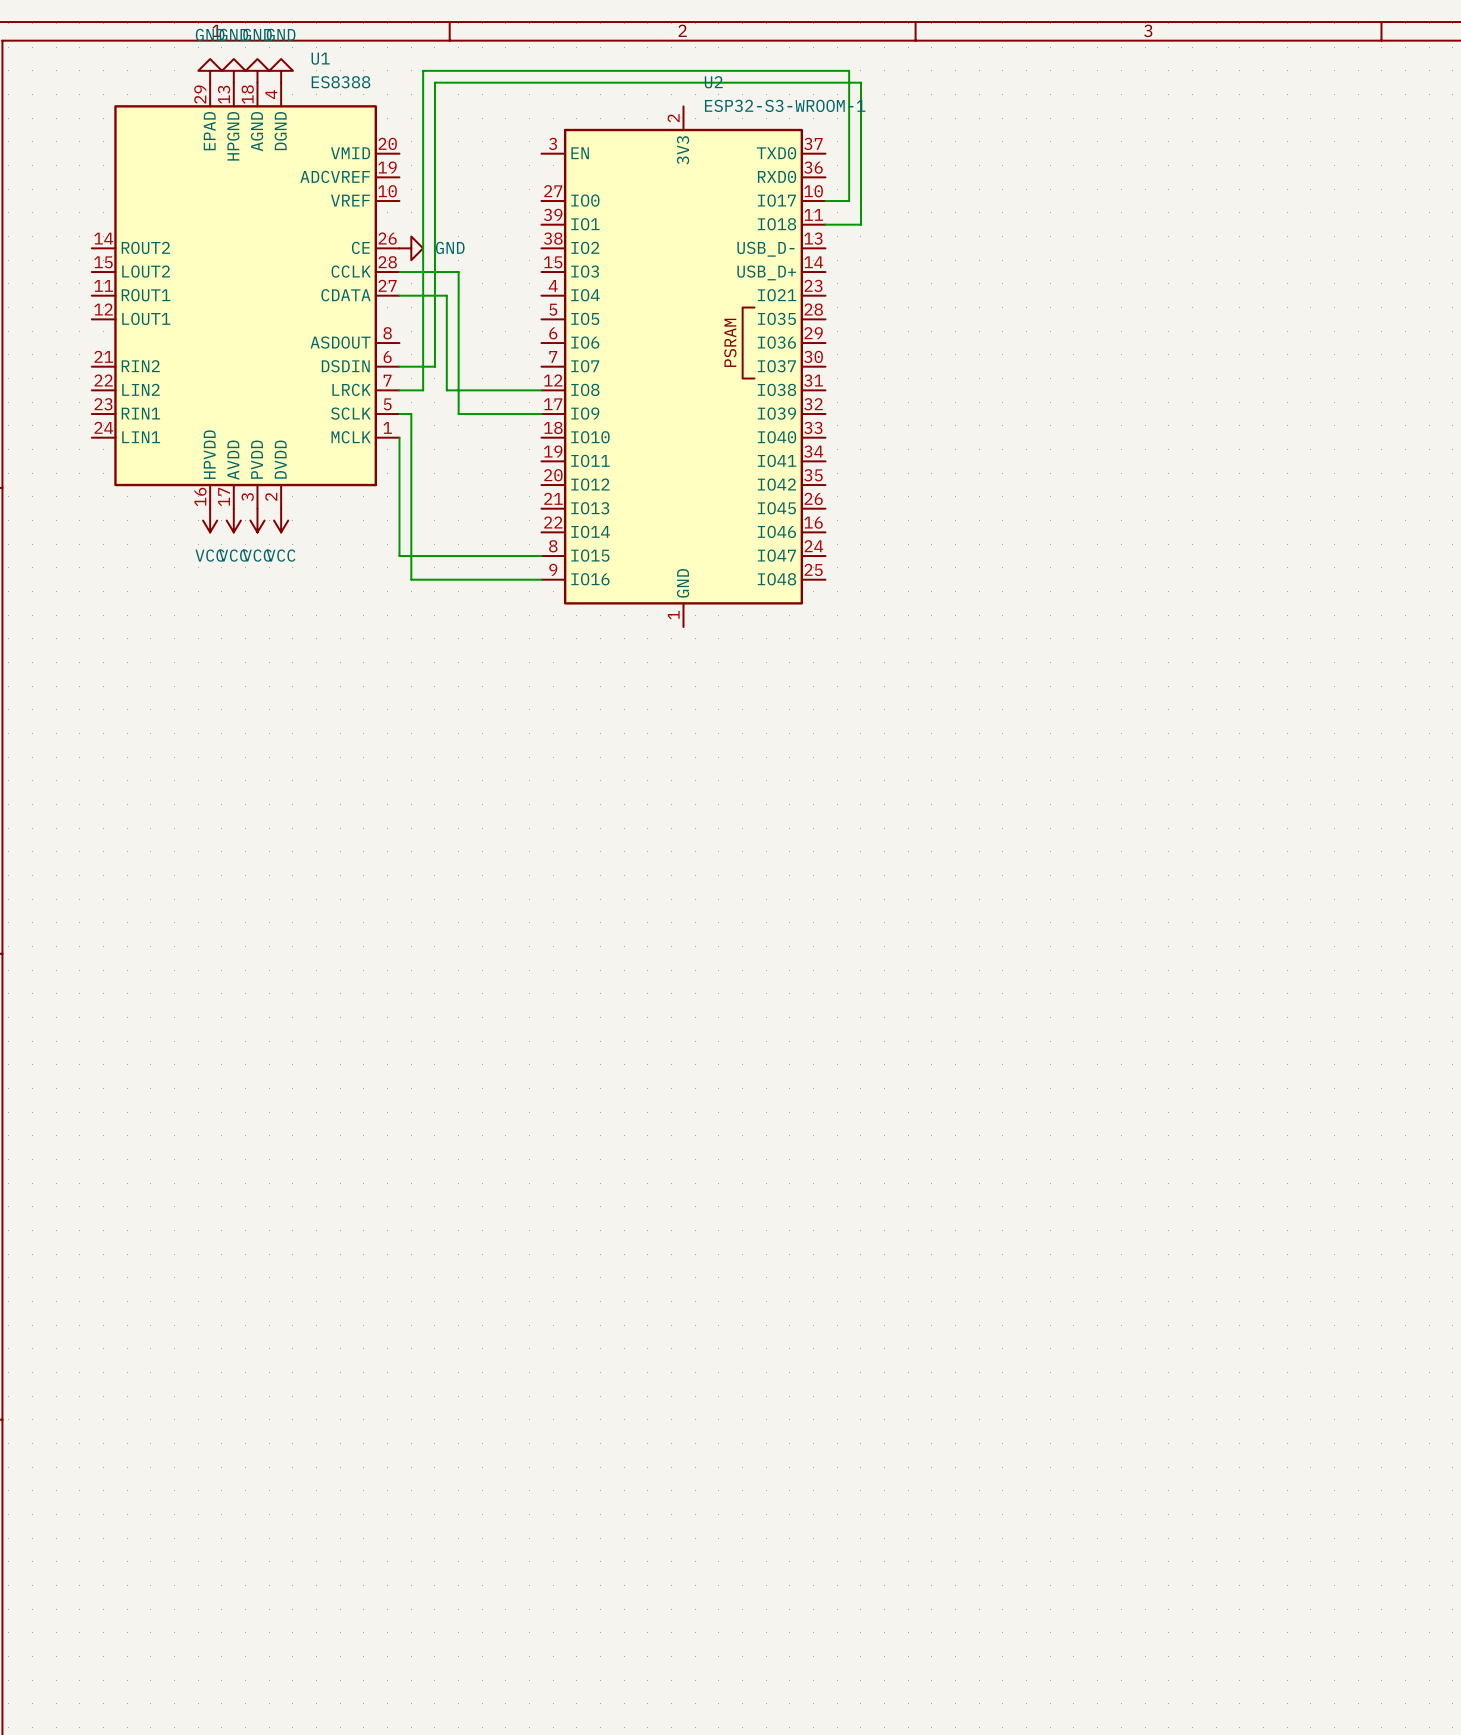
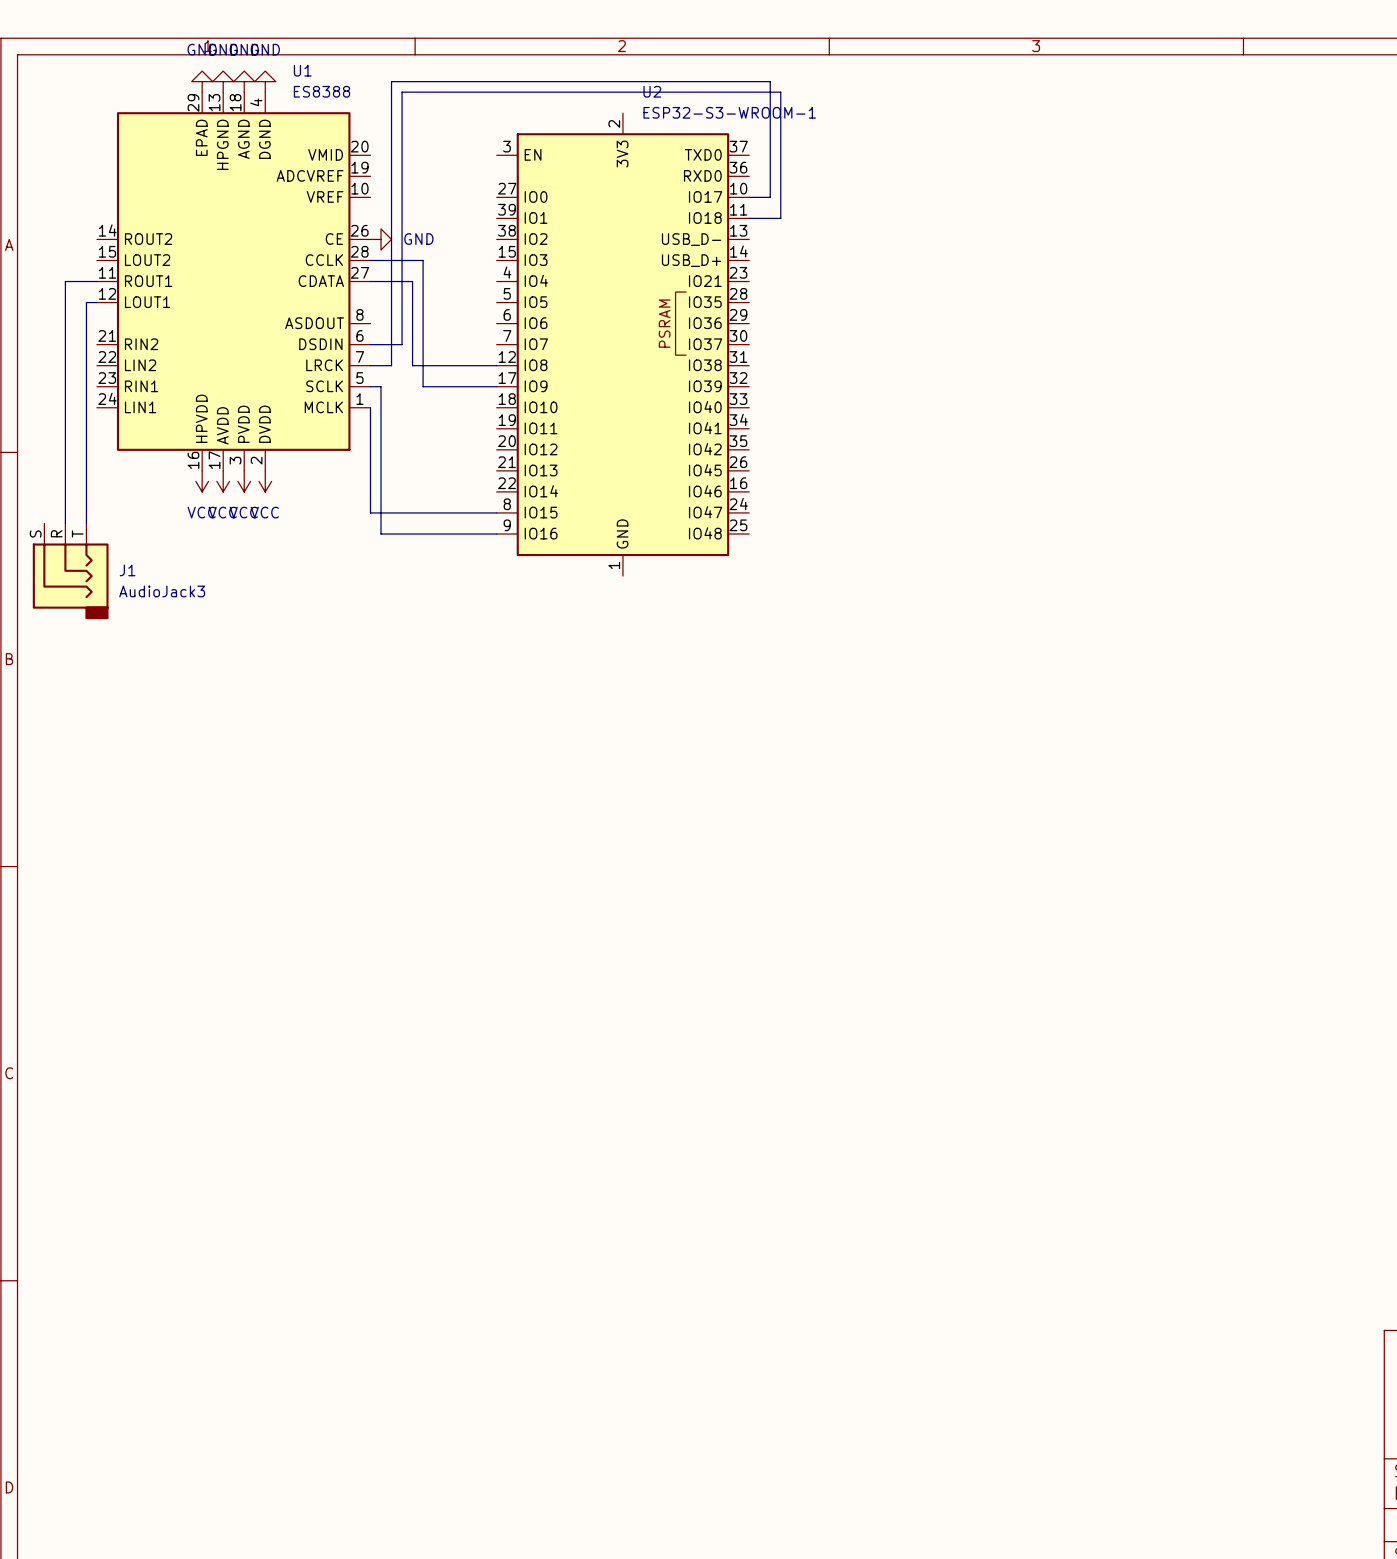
wire: none -> (96, 281) (65, 281) (65, 523)
wire: none -> (96, 302) (86, 302) (86, 523)
J1: none -> AudioJack3 (70, 571)

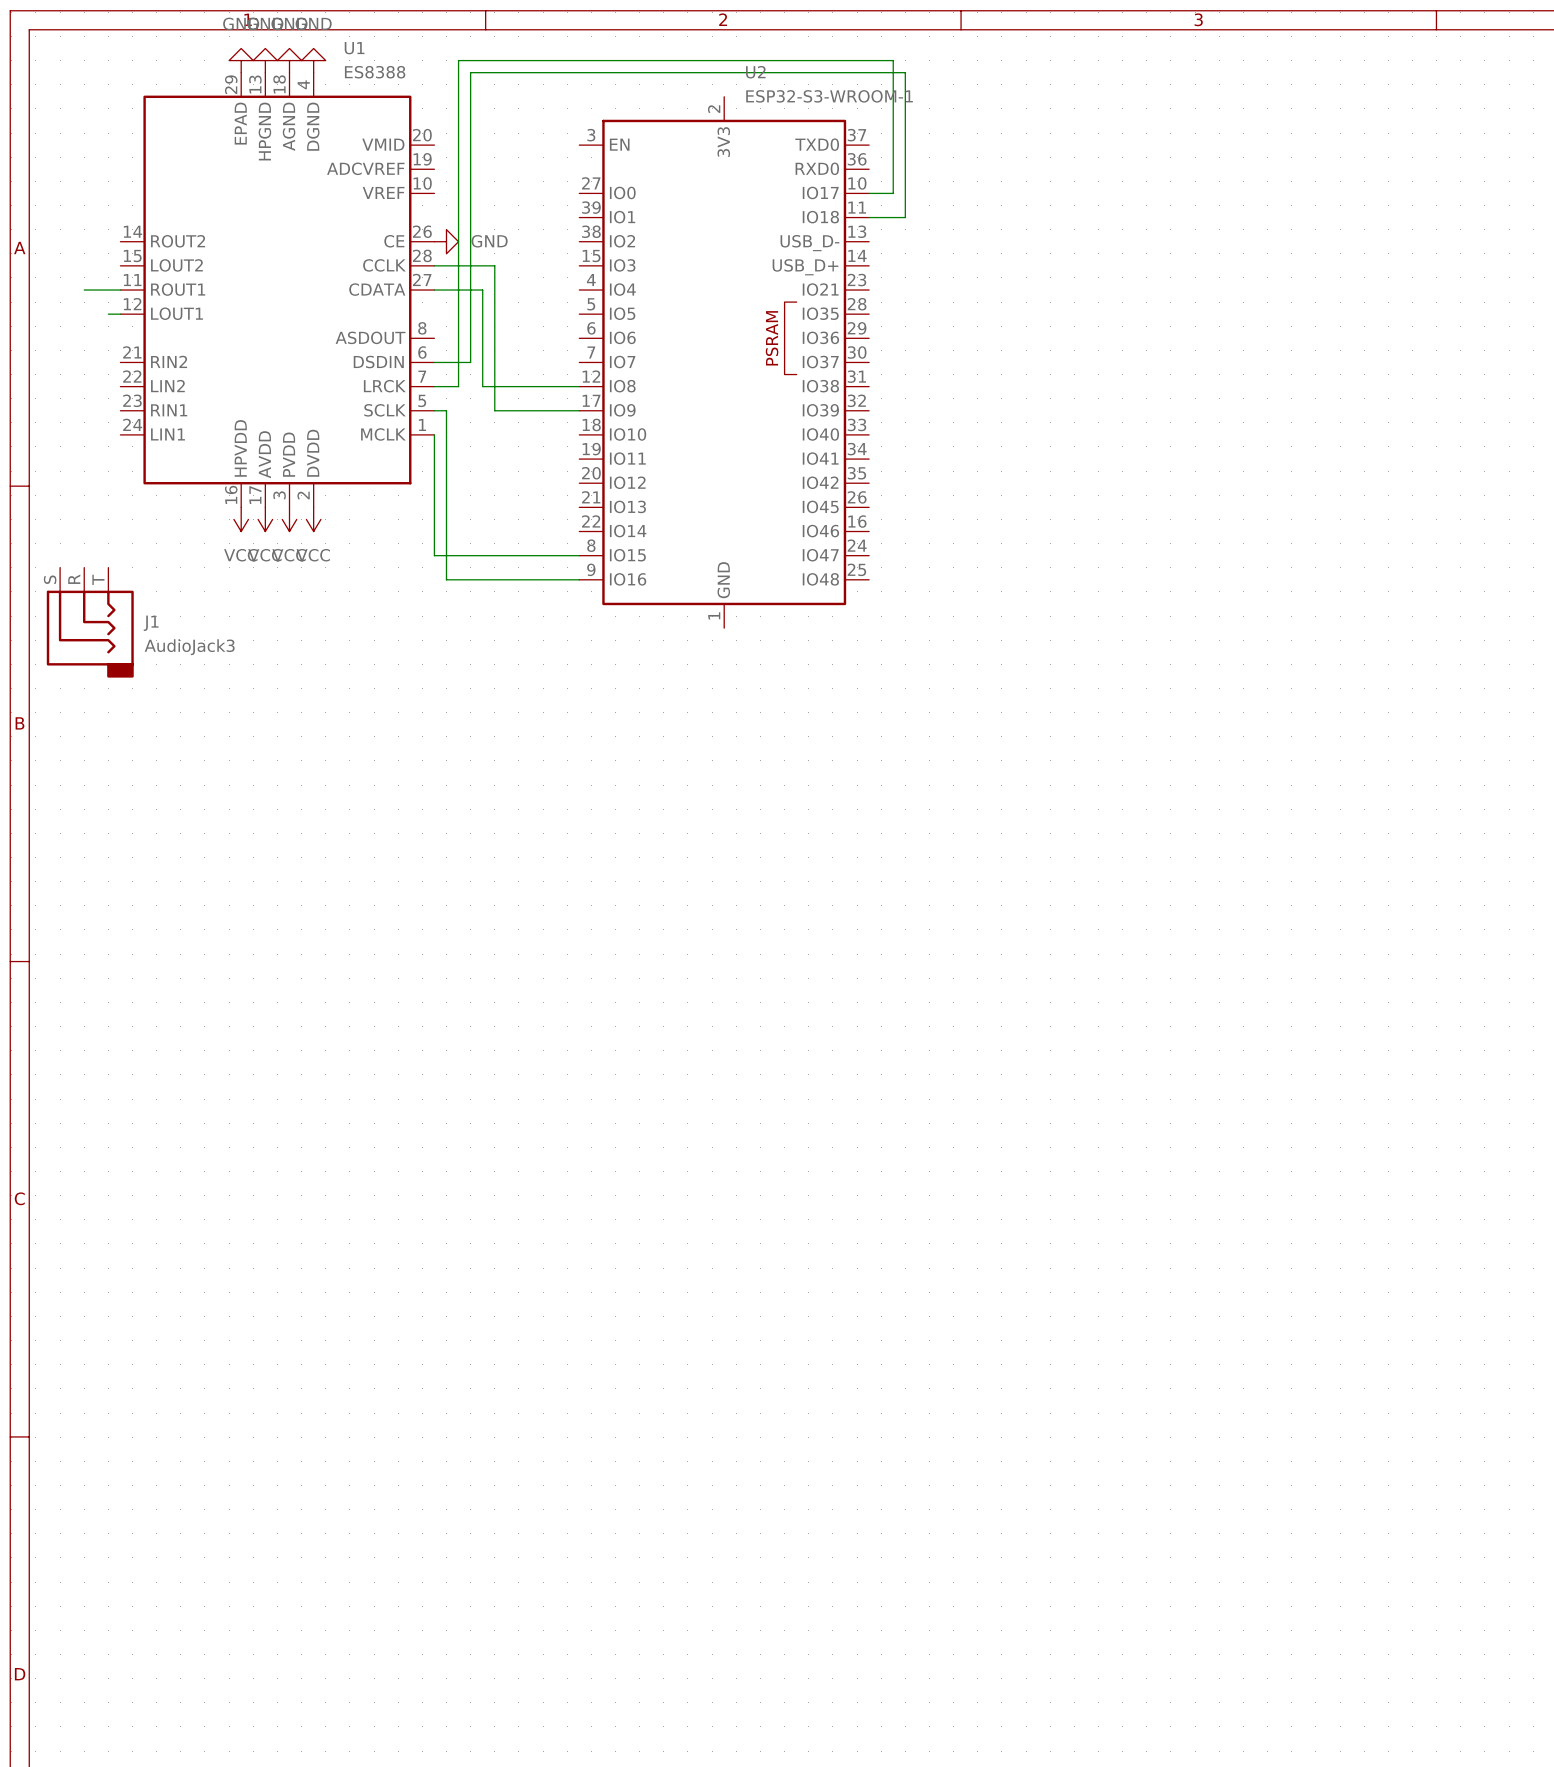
wire: (65, 281) (65, 523) -> none
wire: (86, 302) (86, 523) -> none

